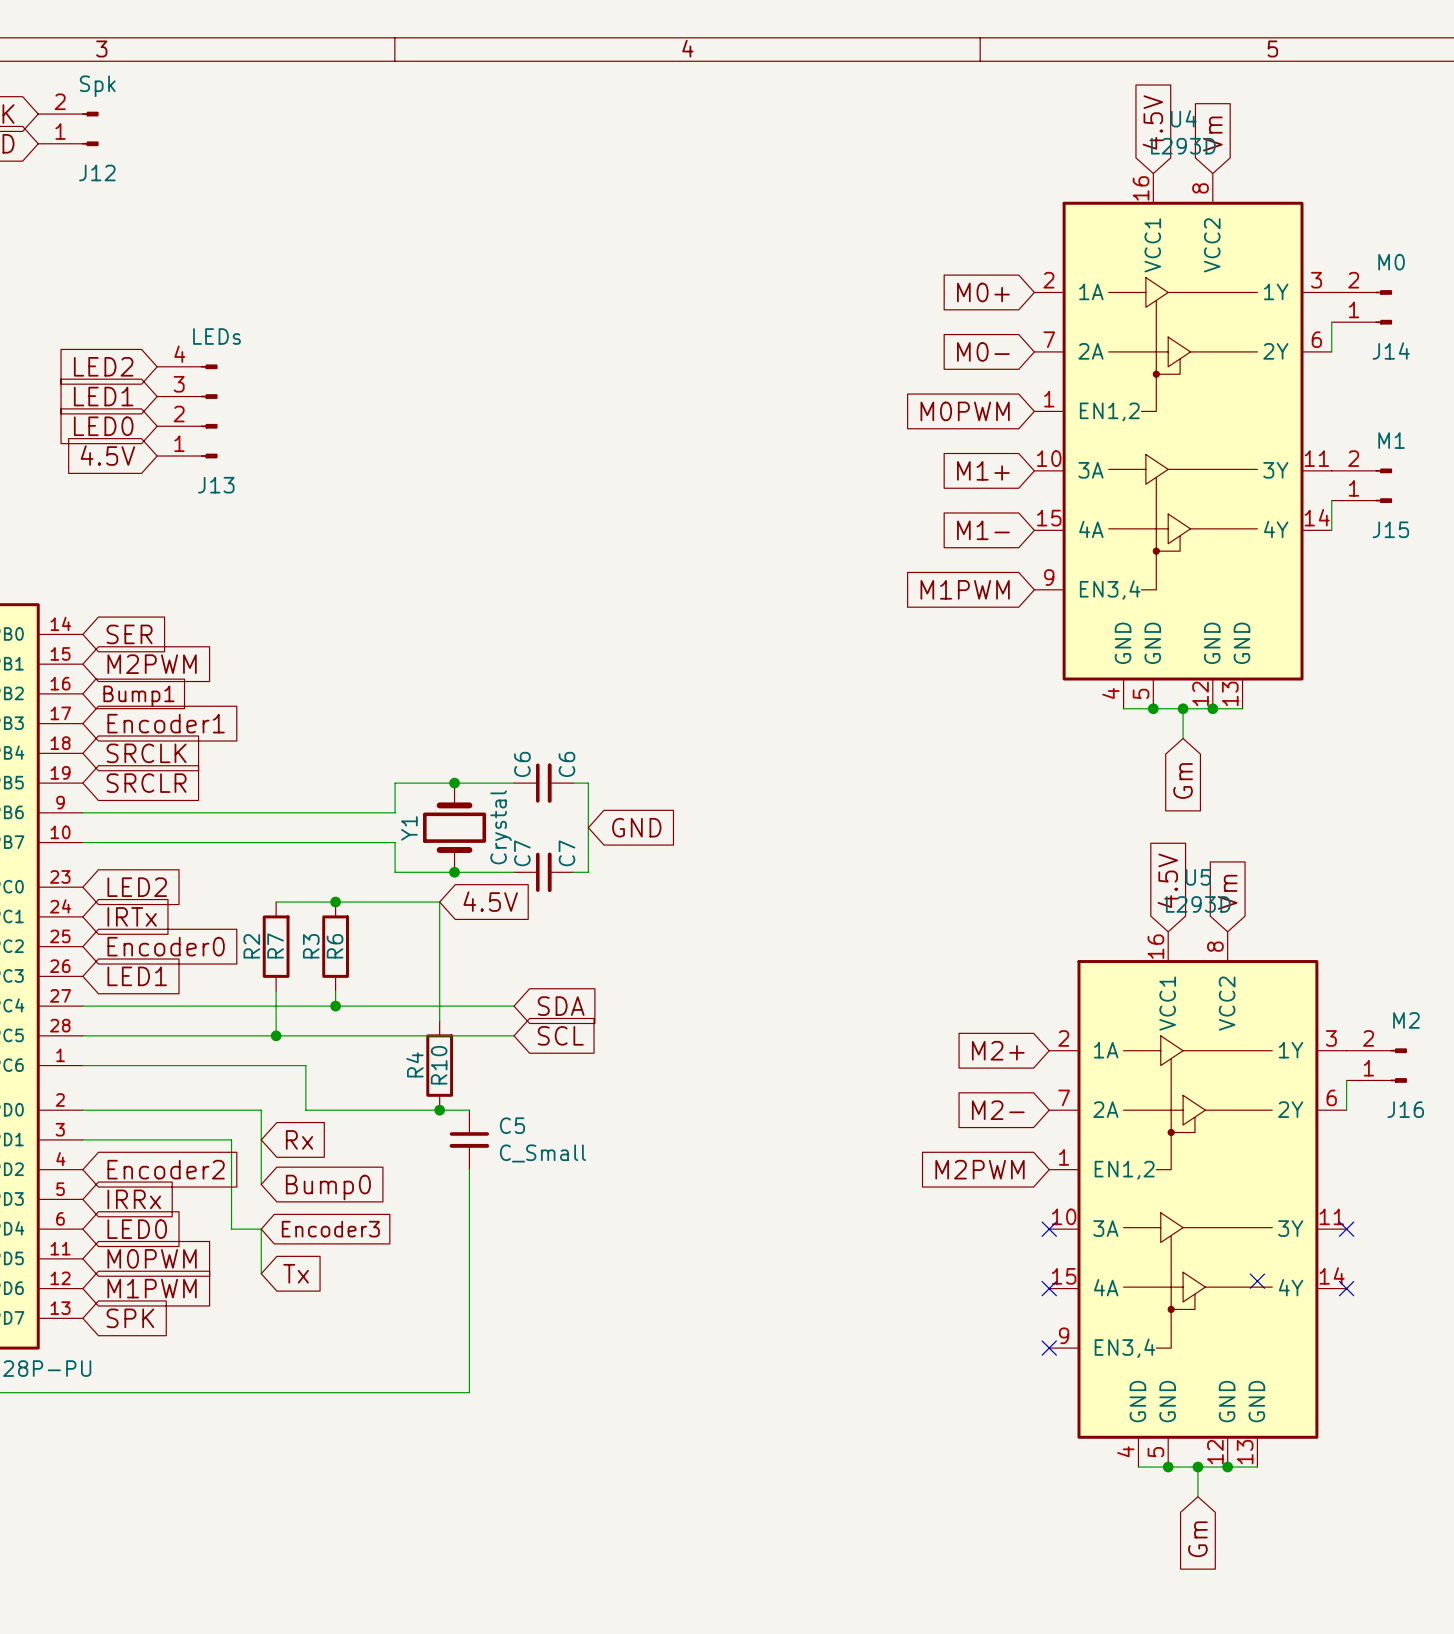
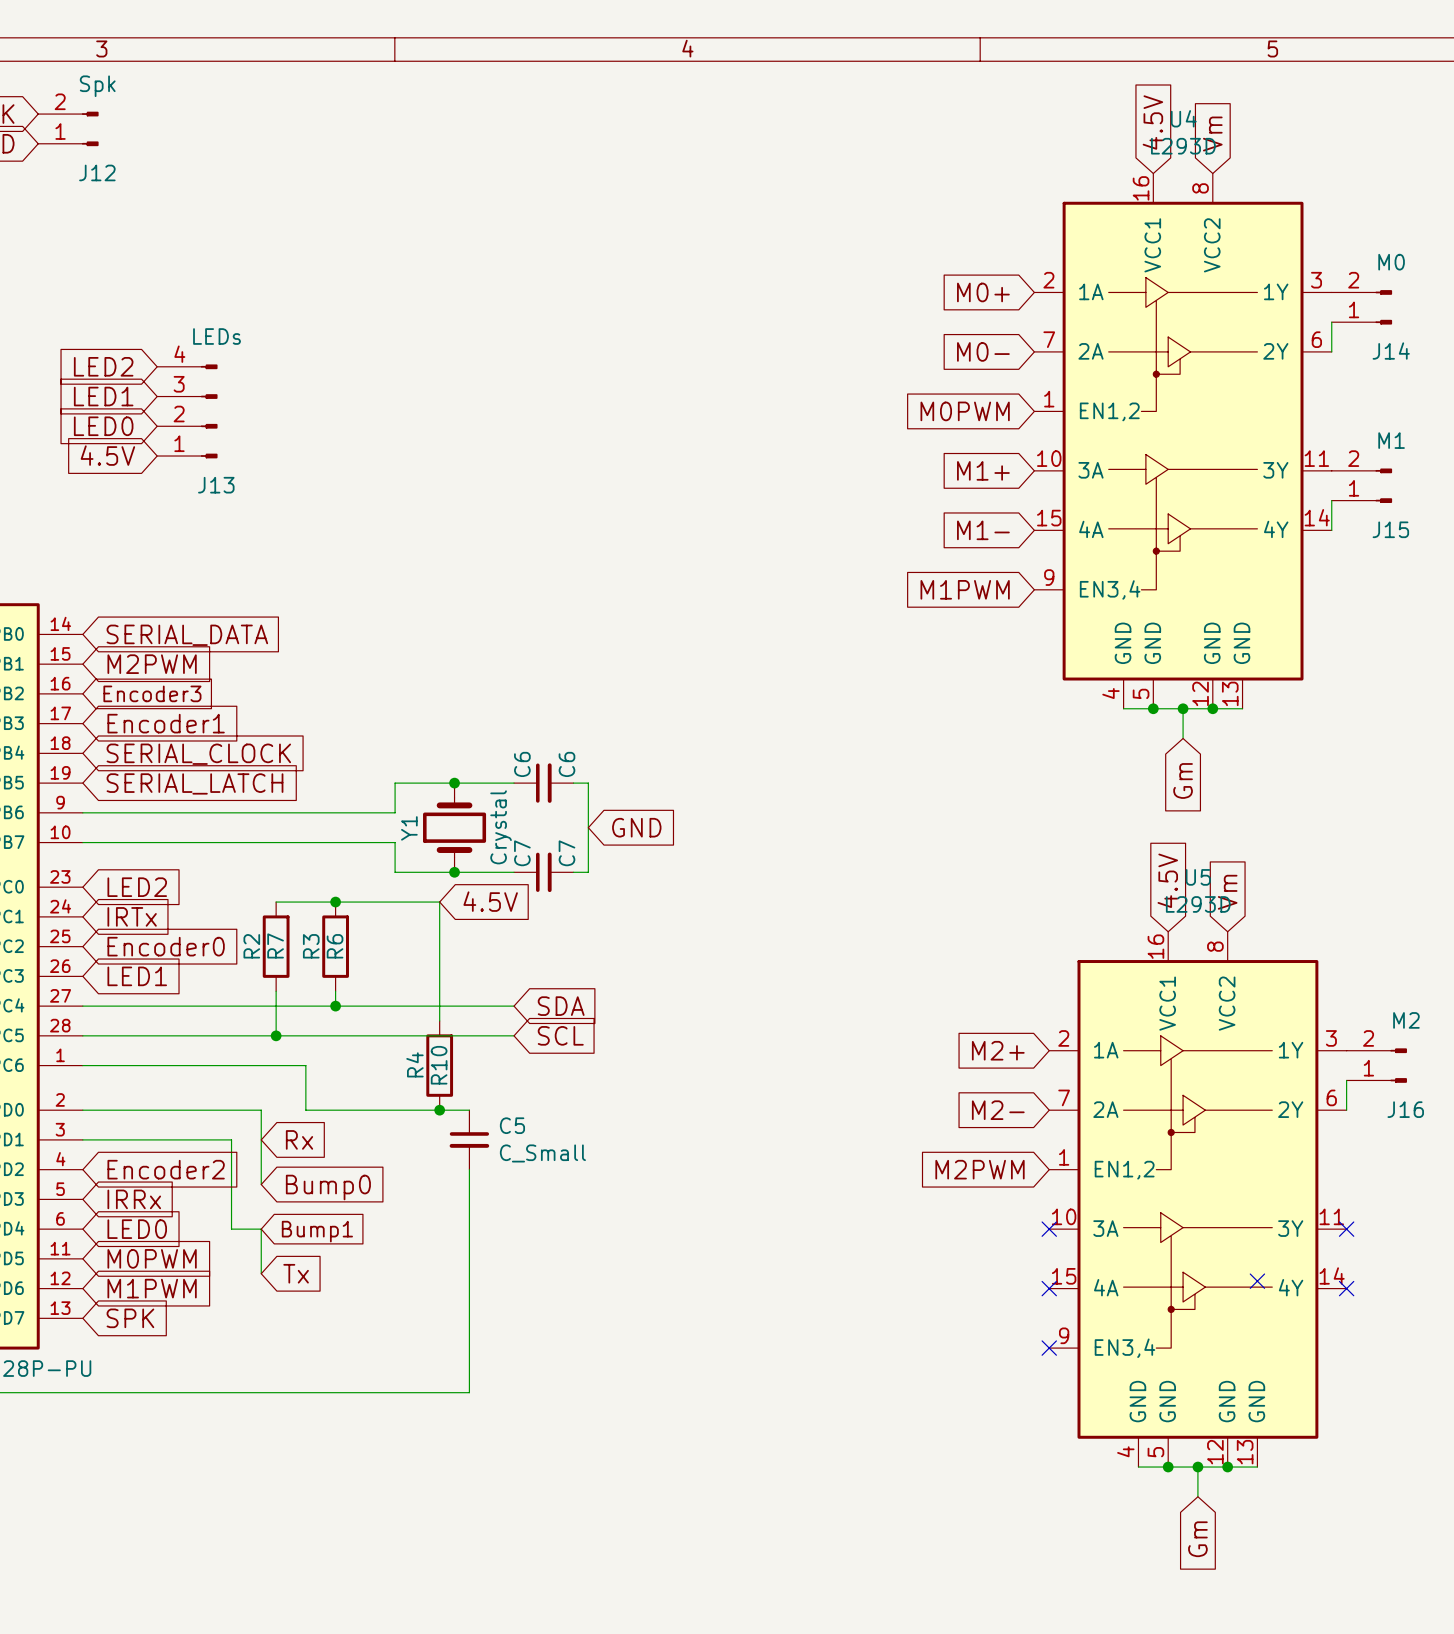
global label: SER (129, 634) -> SERIAL_DATA (187, 635)
global label: Bump1 (138, 696) -> Encoder3 (152, 693)
global label: SRCLK (146, 753) -> SERIAL_CLOCK (198, 754)
global label: SRCLR (146, 783) -> SERIAL_LATCH (195, 783)
global label: Encoder3 (330, 1229) -> Bump1 (317, 1231)

